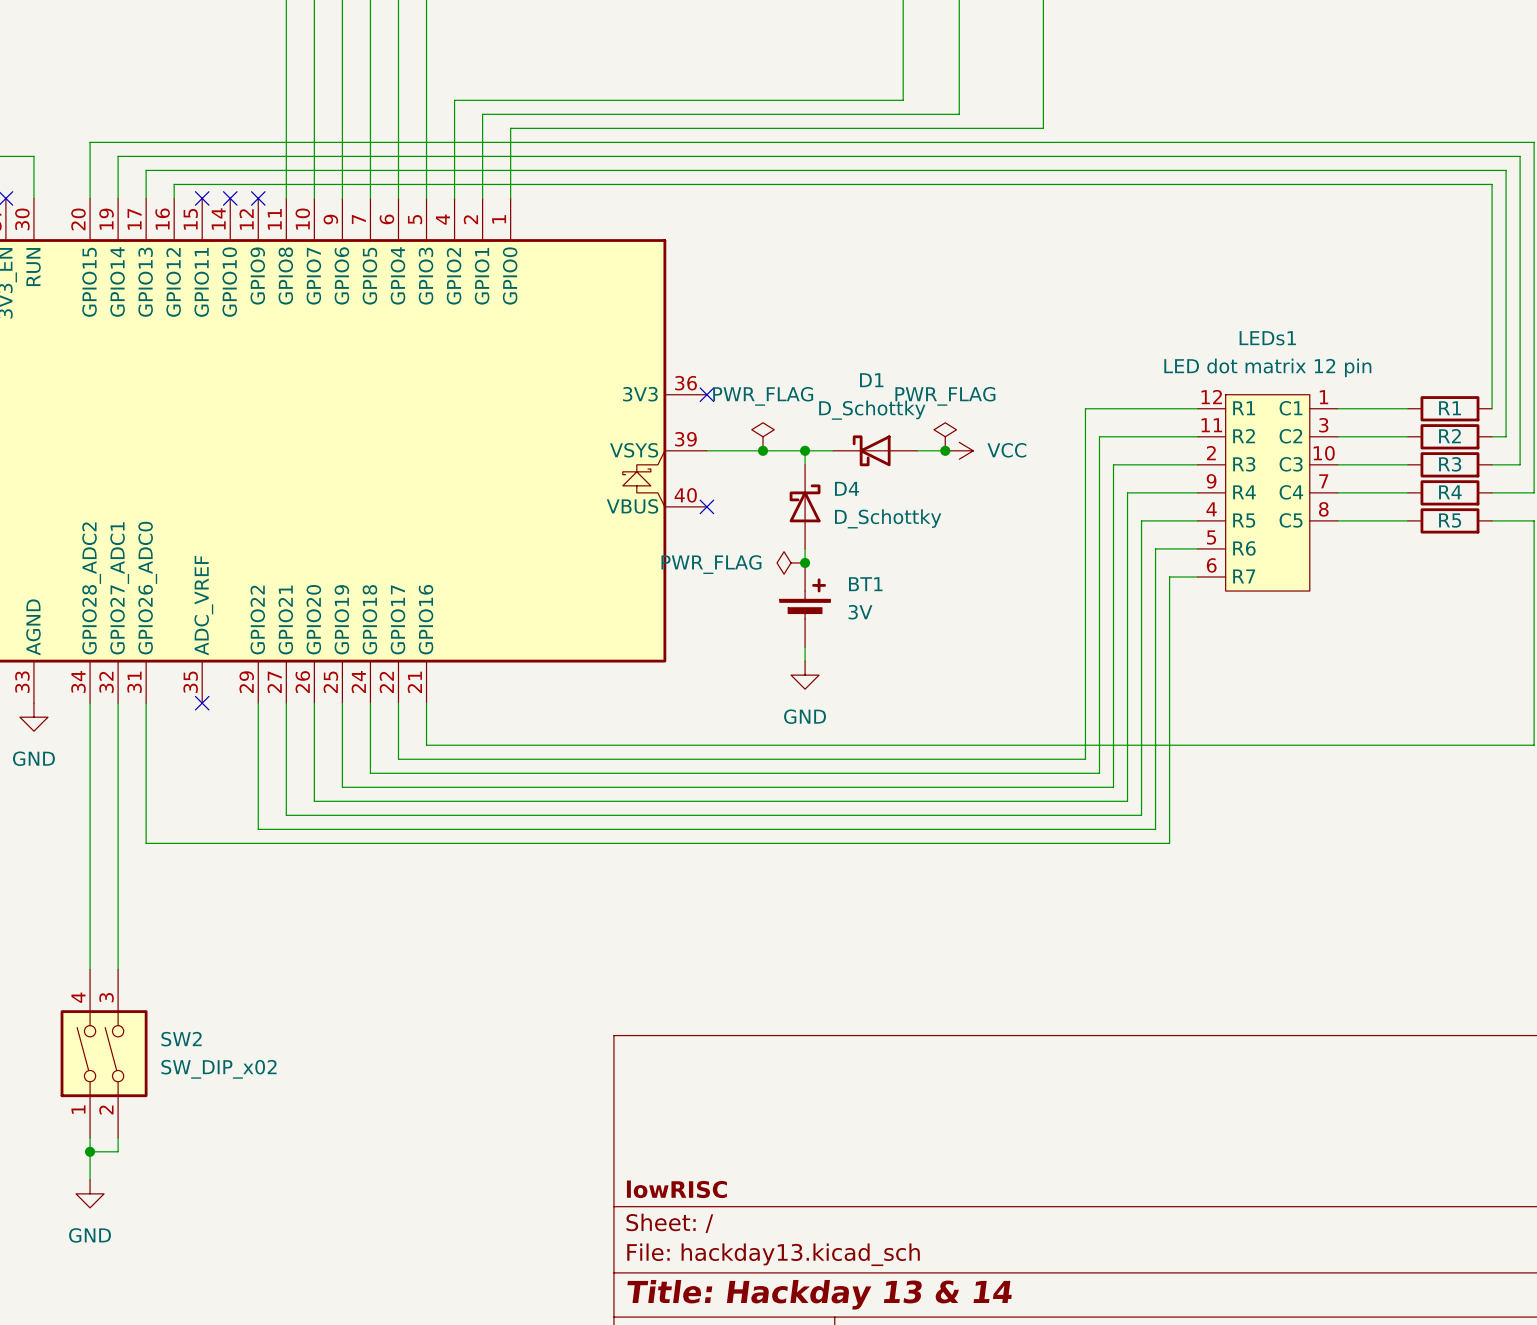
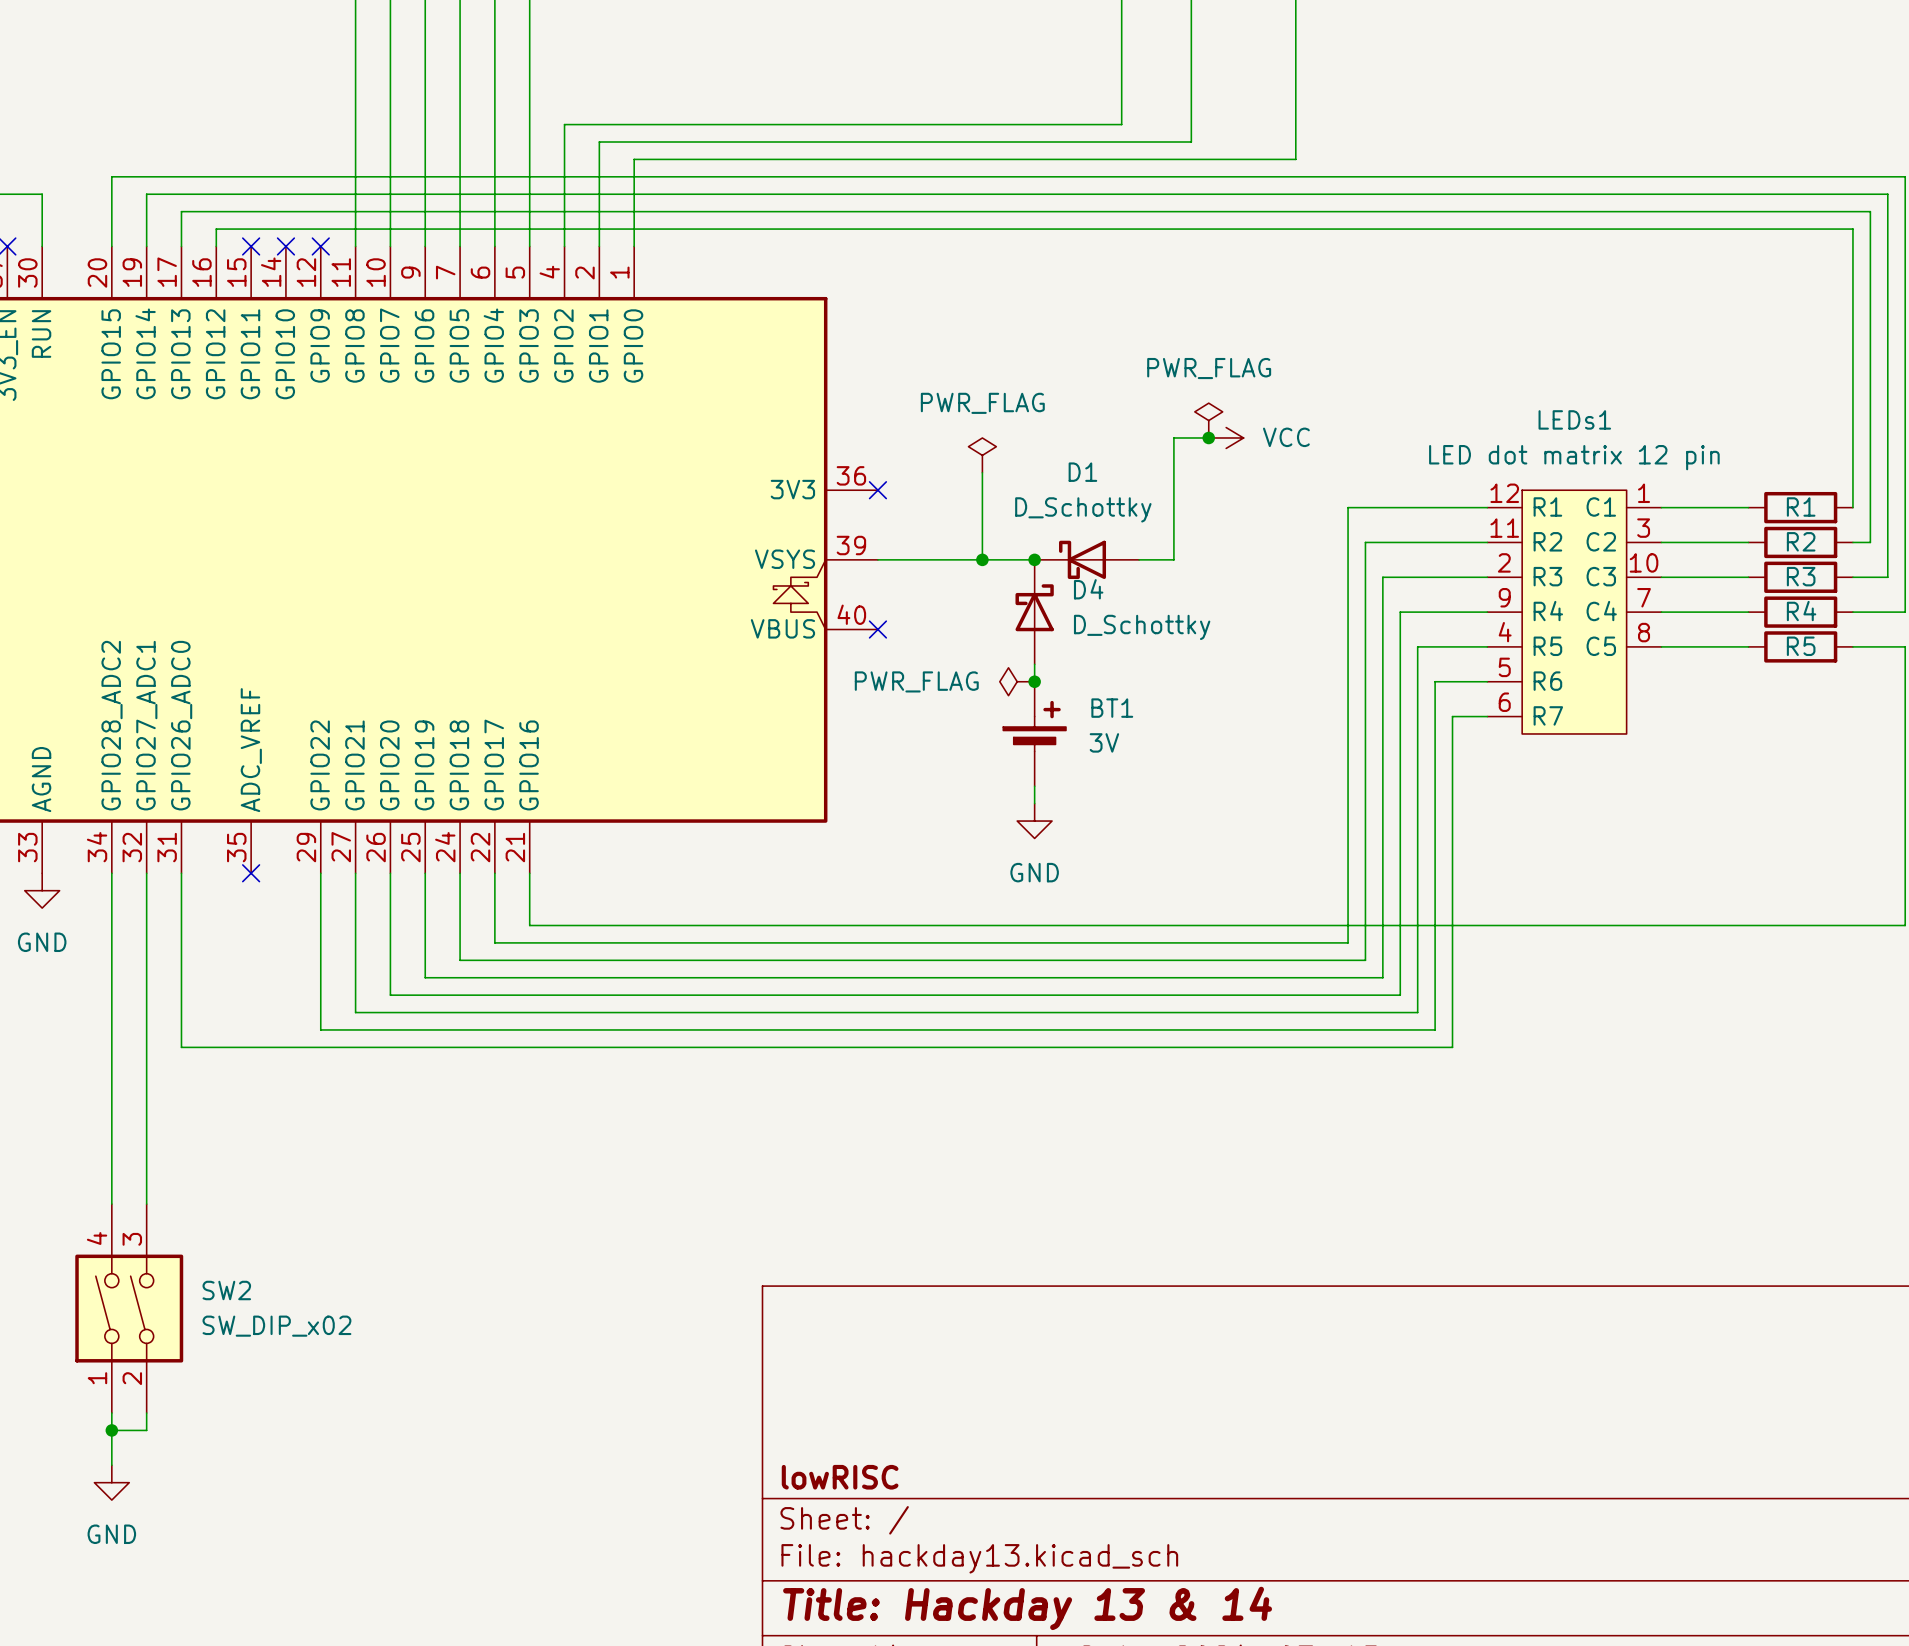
power symbol: none -> PWR_FLAG (1208, 420)
wire: none -> (1208, 437) (1173, 437) (1173, 559)
junction: none -> (1208, 437)
power symbol: none -> PWR_FLAG (982, 455)
wire: none -> (982, 472) (982, 559)
power symbol: PWR_FLAG (763, 436) -> none
power symbol: PWR_FLAG (945, 436) -> none
junction: (763, 450) -> none
junction: none -> (982, 559)
wire: (805, 450) (805, 464) -> none
junction: (805, 450) -> none
junction: none -> (1034, 559)
junction: (945, 450) -> none
power symbol position: VCC (959, 450) -> VCC (1226, 437)
D4 position: (805, 506) -> (1034, 612)
wire: (805, 548) (805, 562) -> (1034, 664) (1034, 681)
power symbol position: PWR_FLAG (791, 562) -> PWR_FLAG (1017, 681)
junction position: (805, 562) -> (1034, 681)
BT1 position: (805, 605) -> (1034, 733)
wire: (805, 647) (805, 661) -> (1034, 786) (1034, 803)
power symbol position: GND (805, 675) -> GND (1034, 821)

